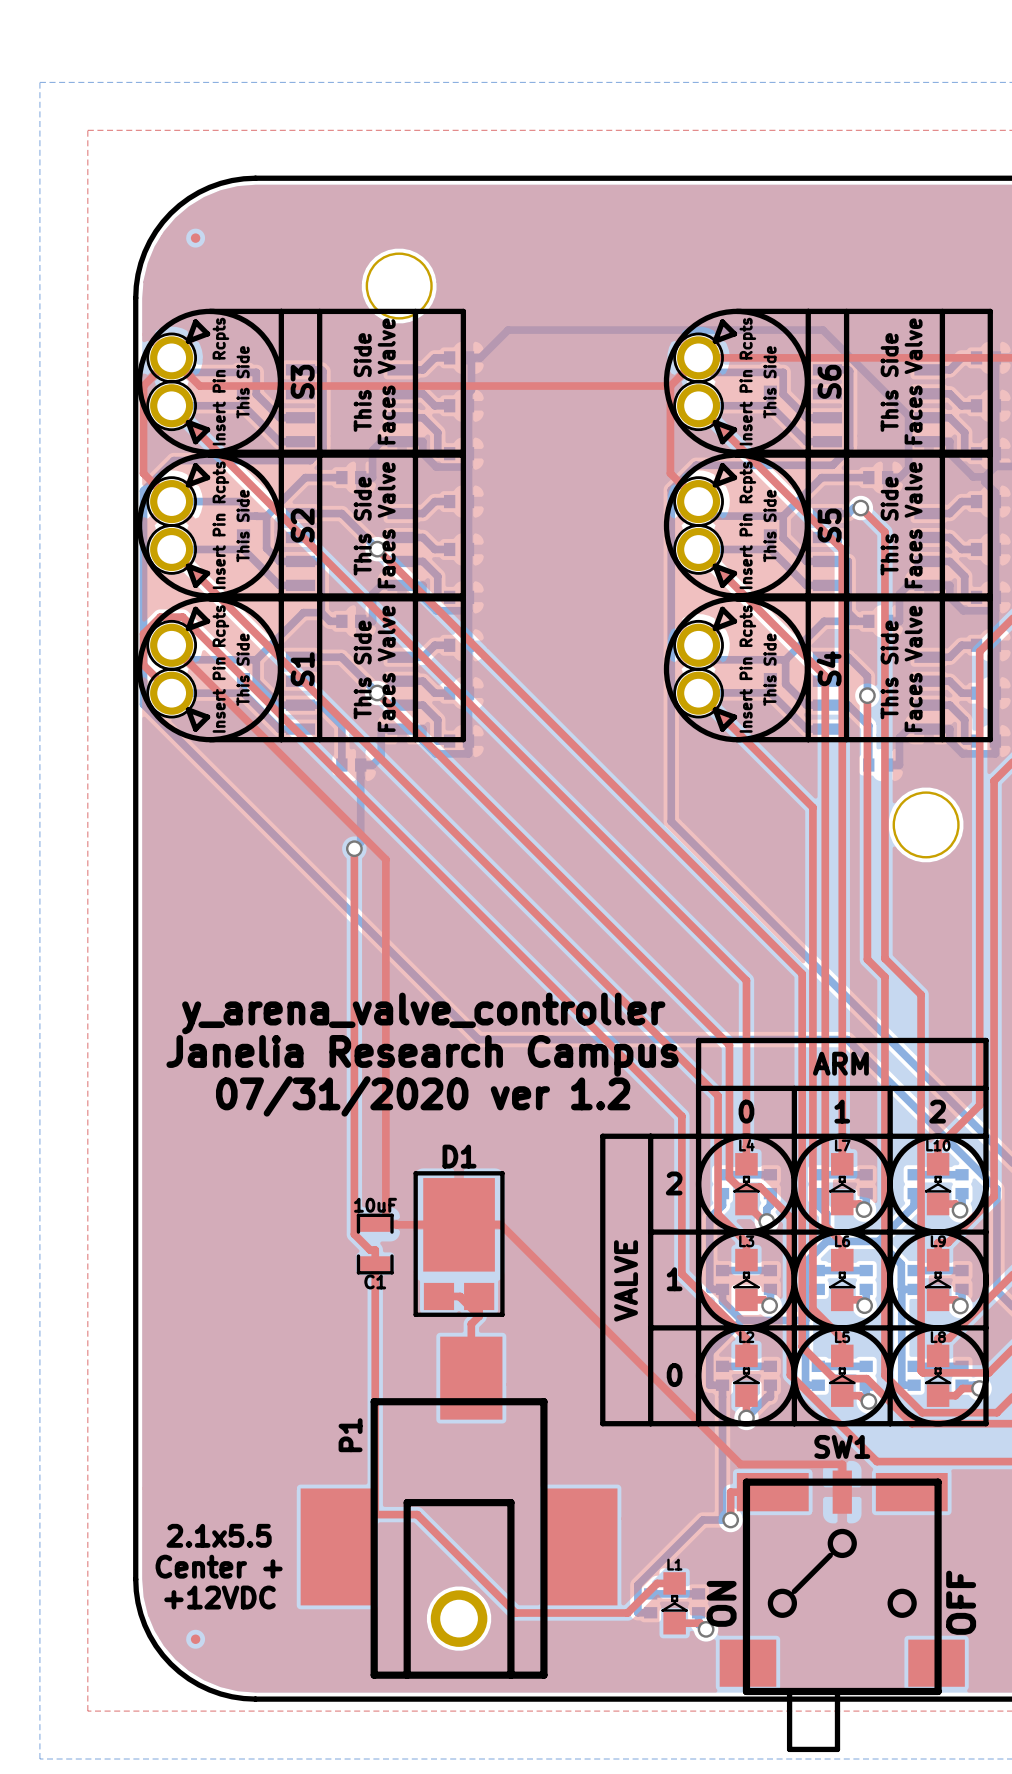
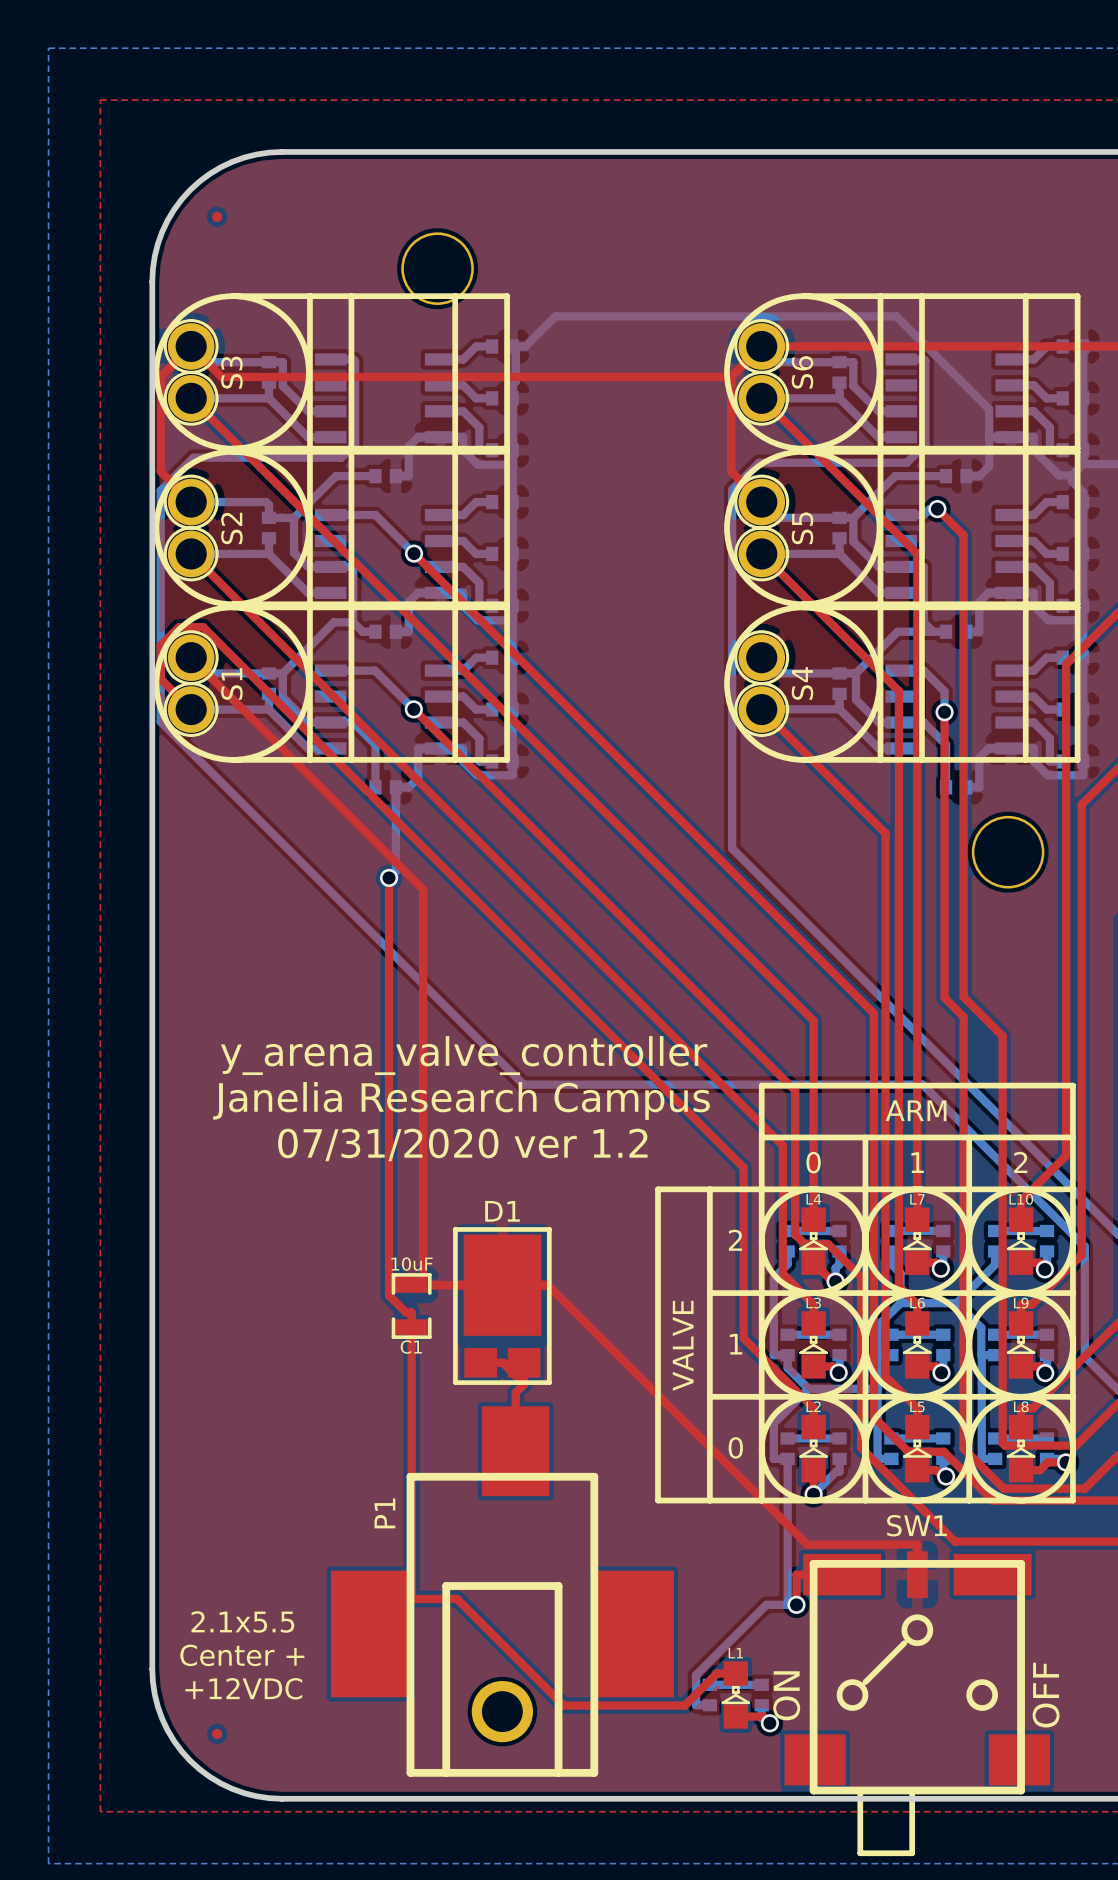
S3 footprint: [136, 308, 467, 455] -> [153, 293, 510, 452]
S6 footprint: [663, 308, 993, 455] -> [724, 293, 1081, 452]
S3 name position: S3 (302, 381) -> S3 (231, 372)
S6 name position: S6 (829, 381) -> S6 (802, 372)
S2 footprint: [136, 452, 467, 599] -> [153, 448, 510, 608]
S5 footprint: [663, 452, 993, 599] -> [724, 448, 1081, 608]
S2 name position: S2 (302, 525) -> S2 (231, 528)
S5 name position: S5 (829, 525) -> S5 (802, 528)
S1 footprint: [136, 596, 467, 743] -> [153, 604, 510, 763]
S4 footprint: [663, 596, 993, 743] -> [724, 604, 1081, 763]
S4 name position: S4 (829, 668) -> S4 (802, 683)
S1 name position: S1 (302, 669) -> S1 (231, 684)

